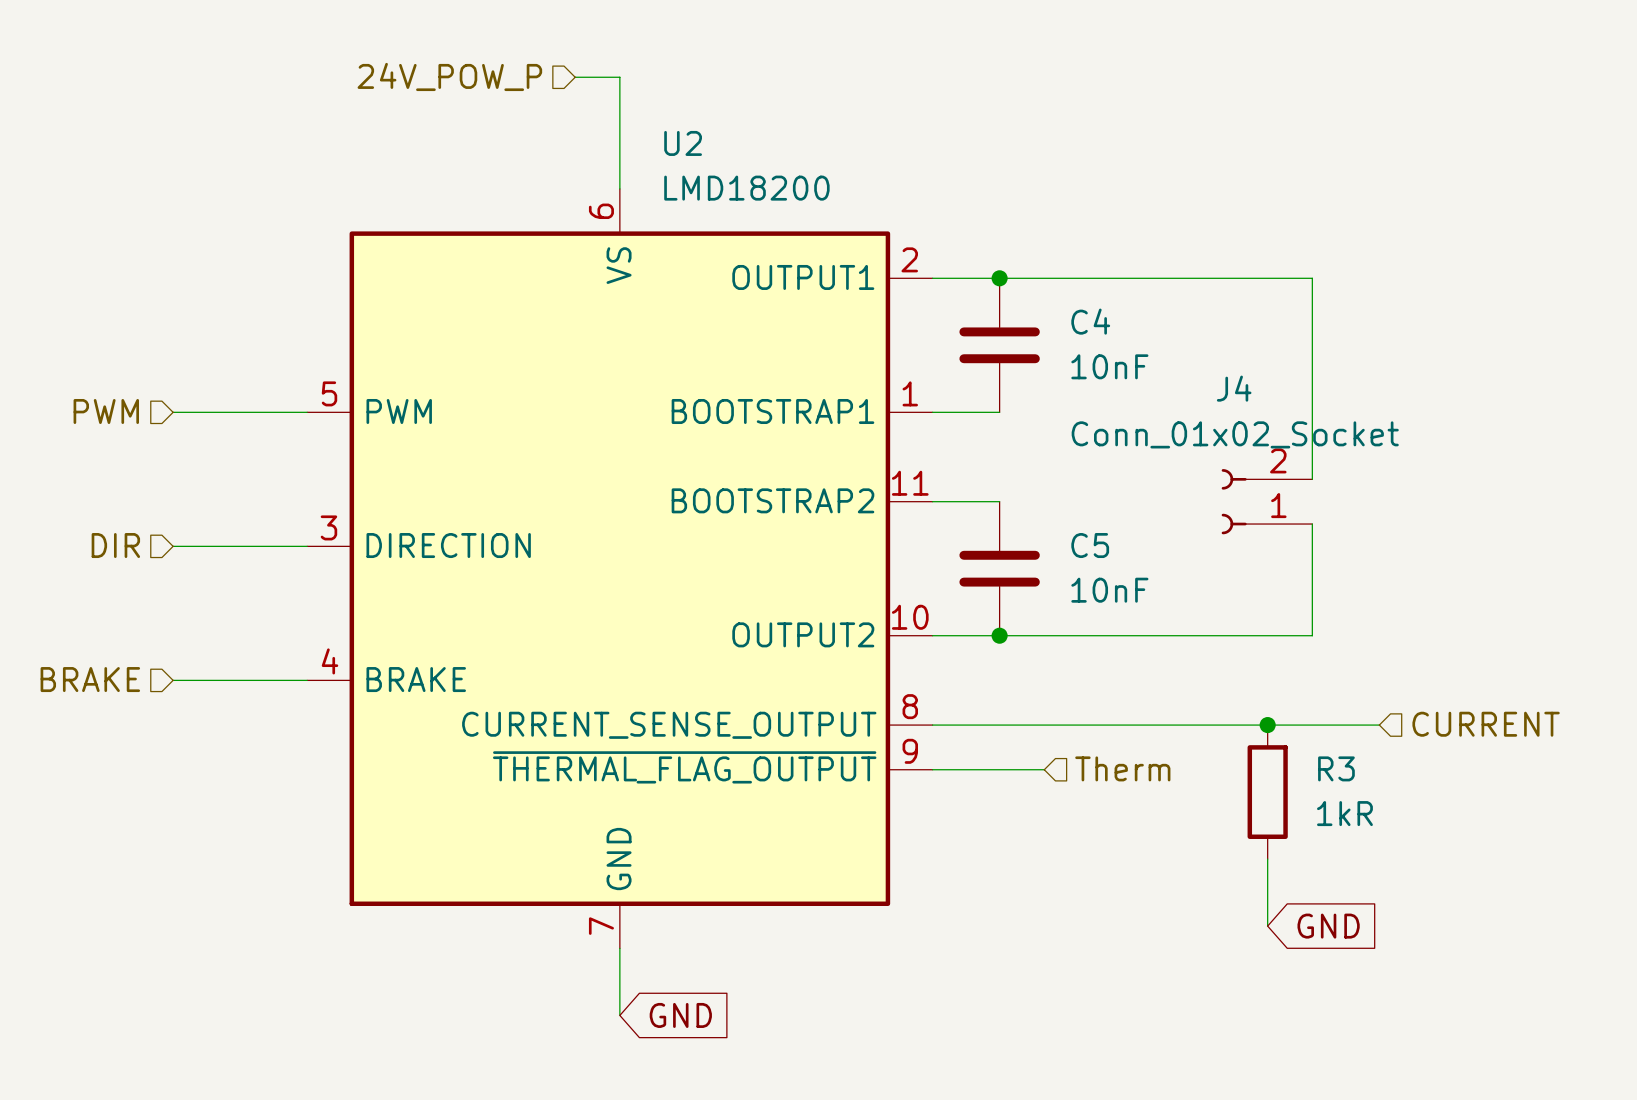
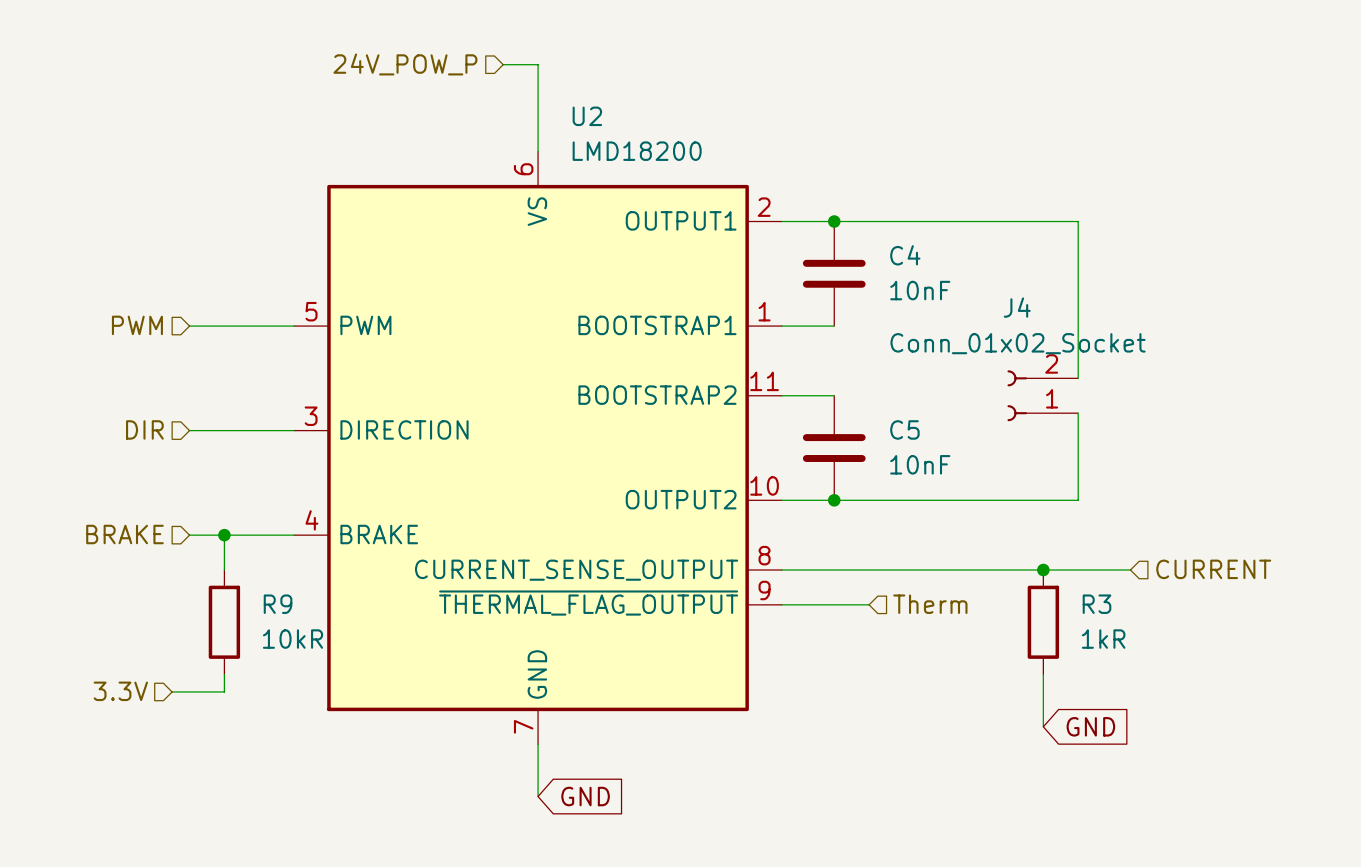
wire: none -> (224, 535) (224, 570)
junction: none -> (224, 535)
R9: none -> 10kR (224, 622)
wire: none -> (224, 674) (224, 691) (172, 691)
hierarchical label: none -> 3.3V (120, 691)

